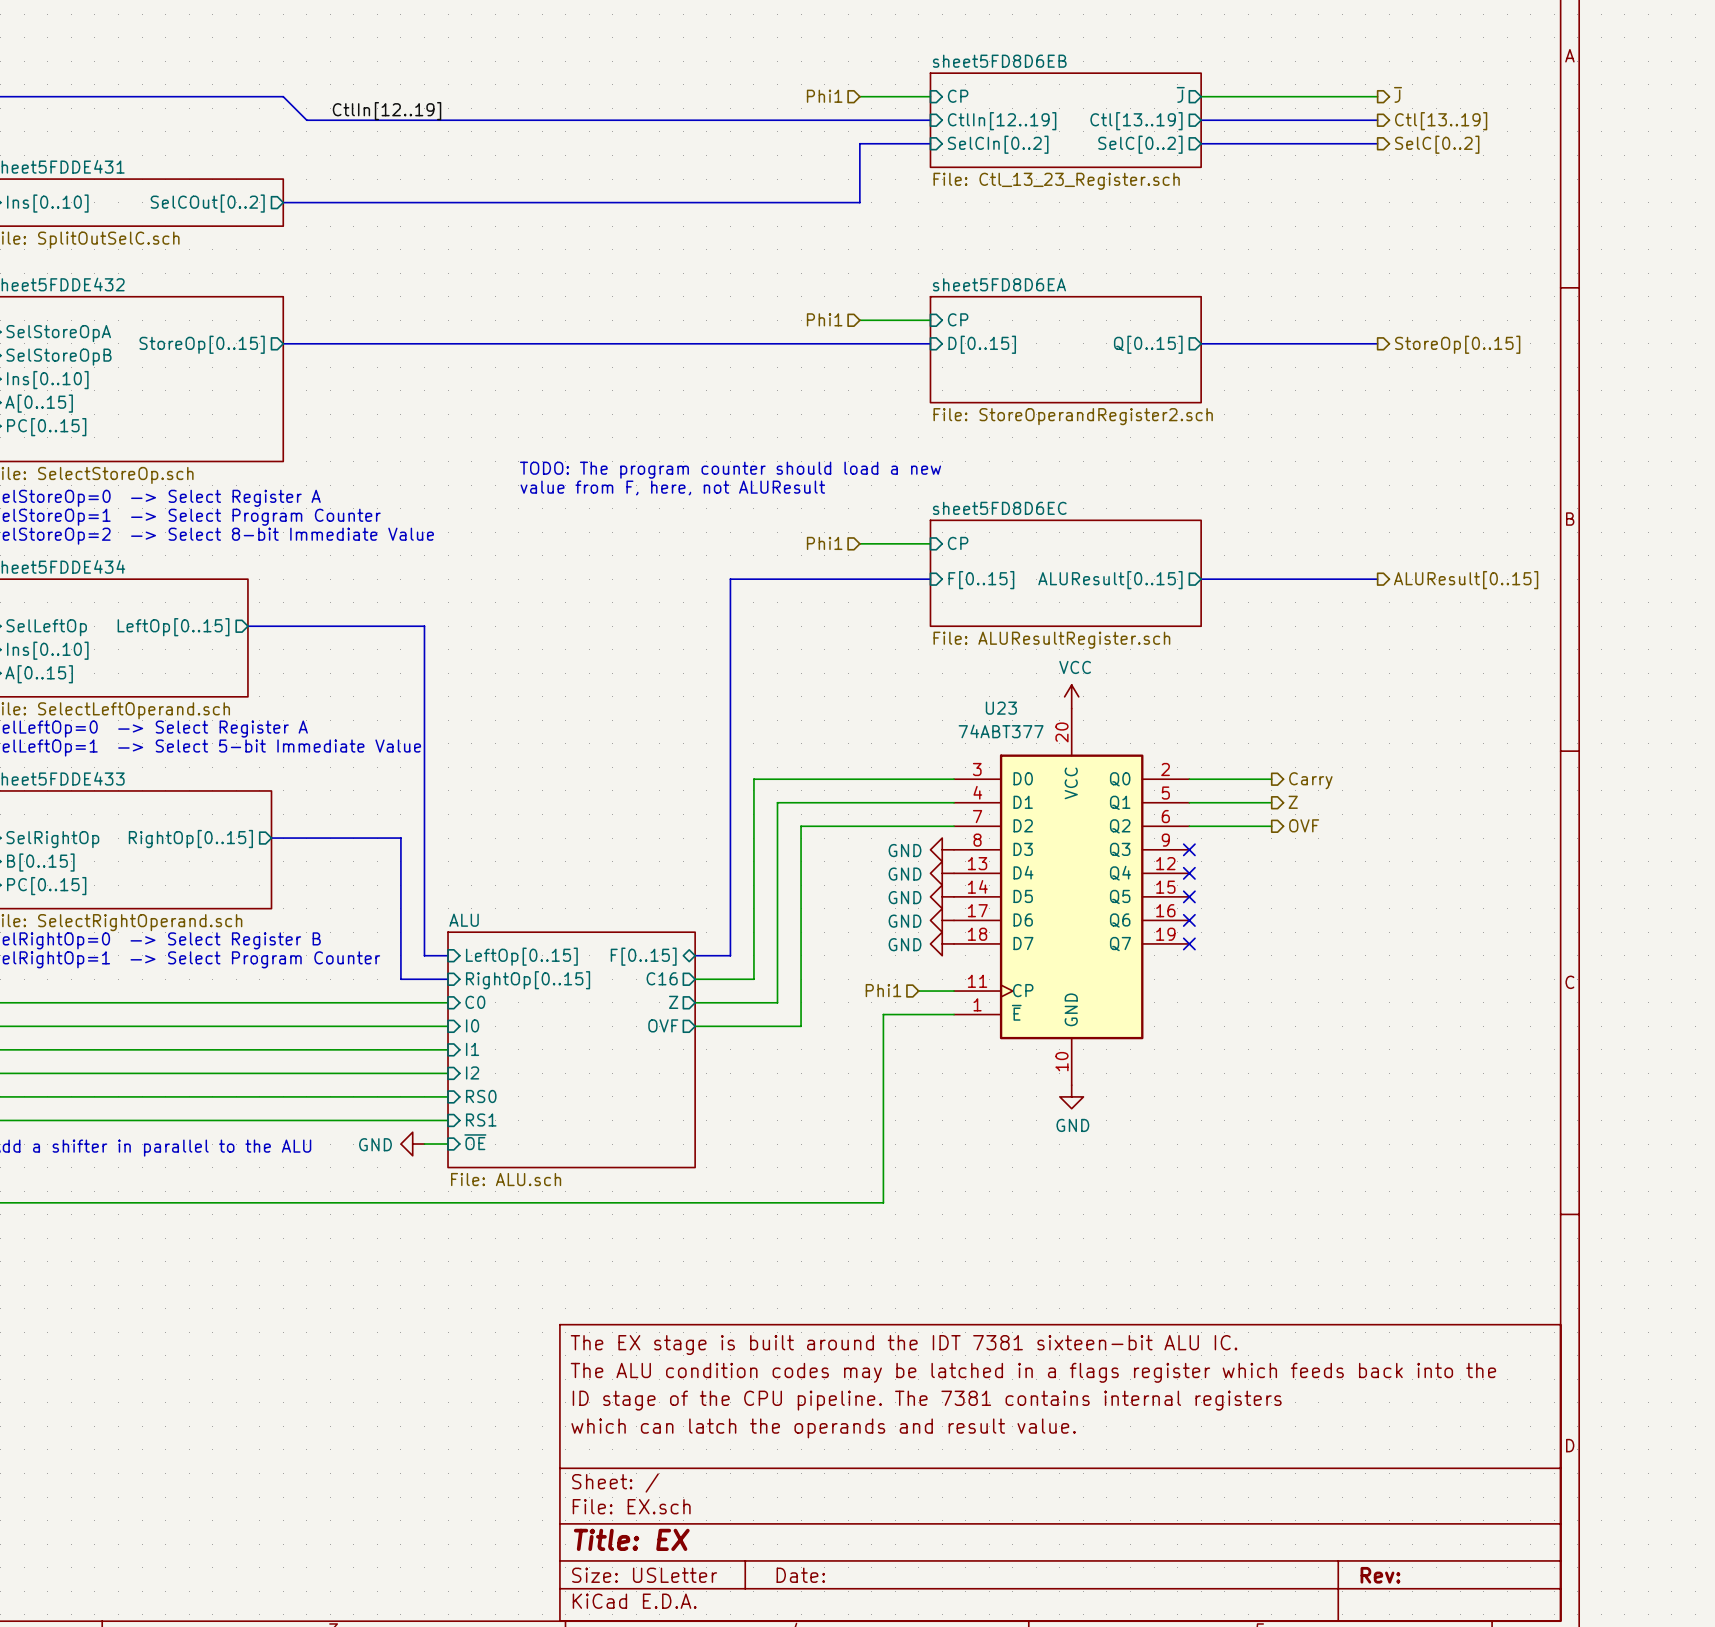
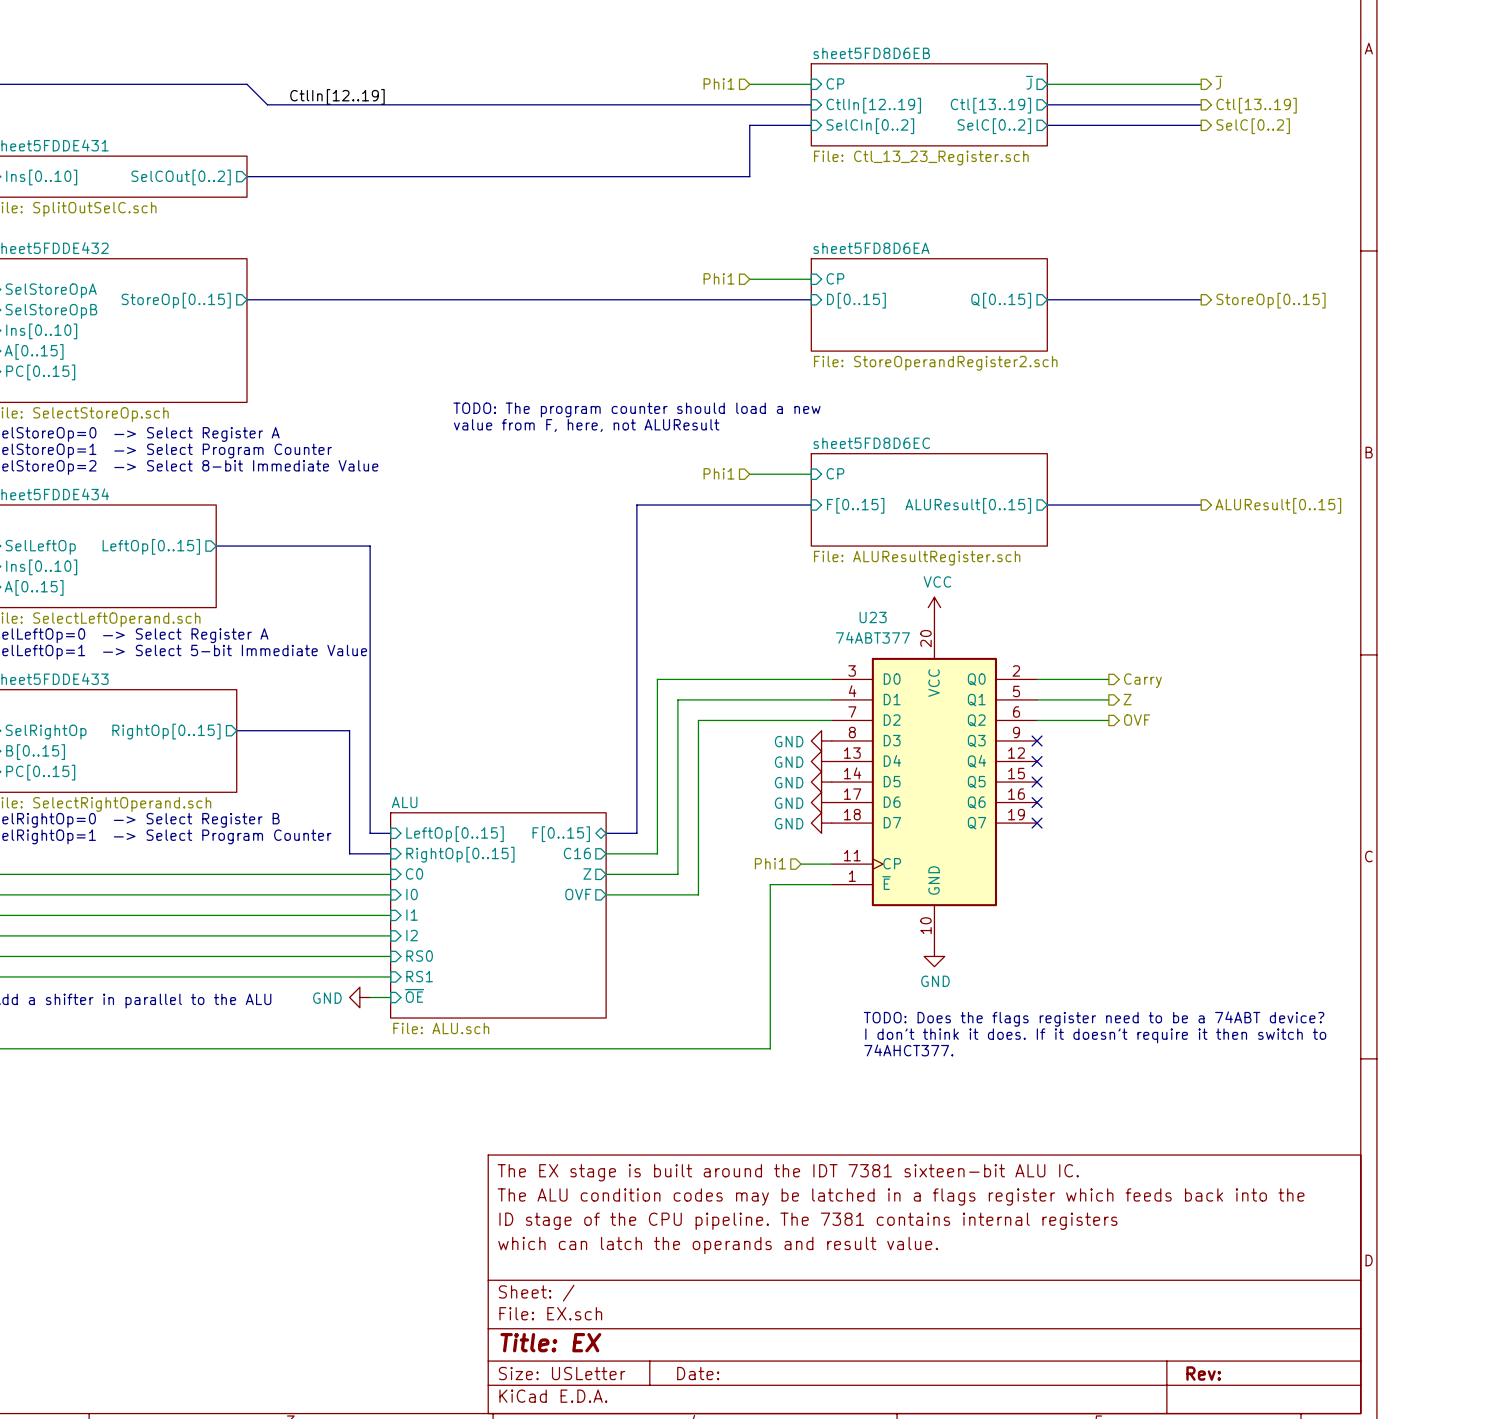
text: none -> TODO: Does the flags register need to be a 74ABT device? (1094, 1019)
text: none -> I don’t think it does. If it doesn’t require it then switch to (1095, 1035)
text: none -> 74AHCT377. (908, 1050)

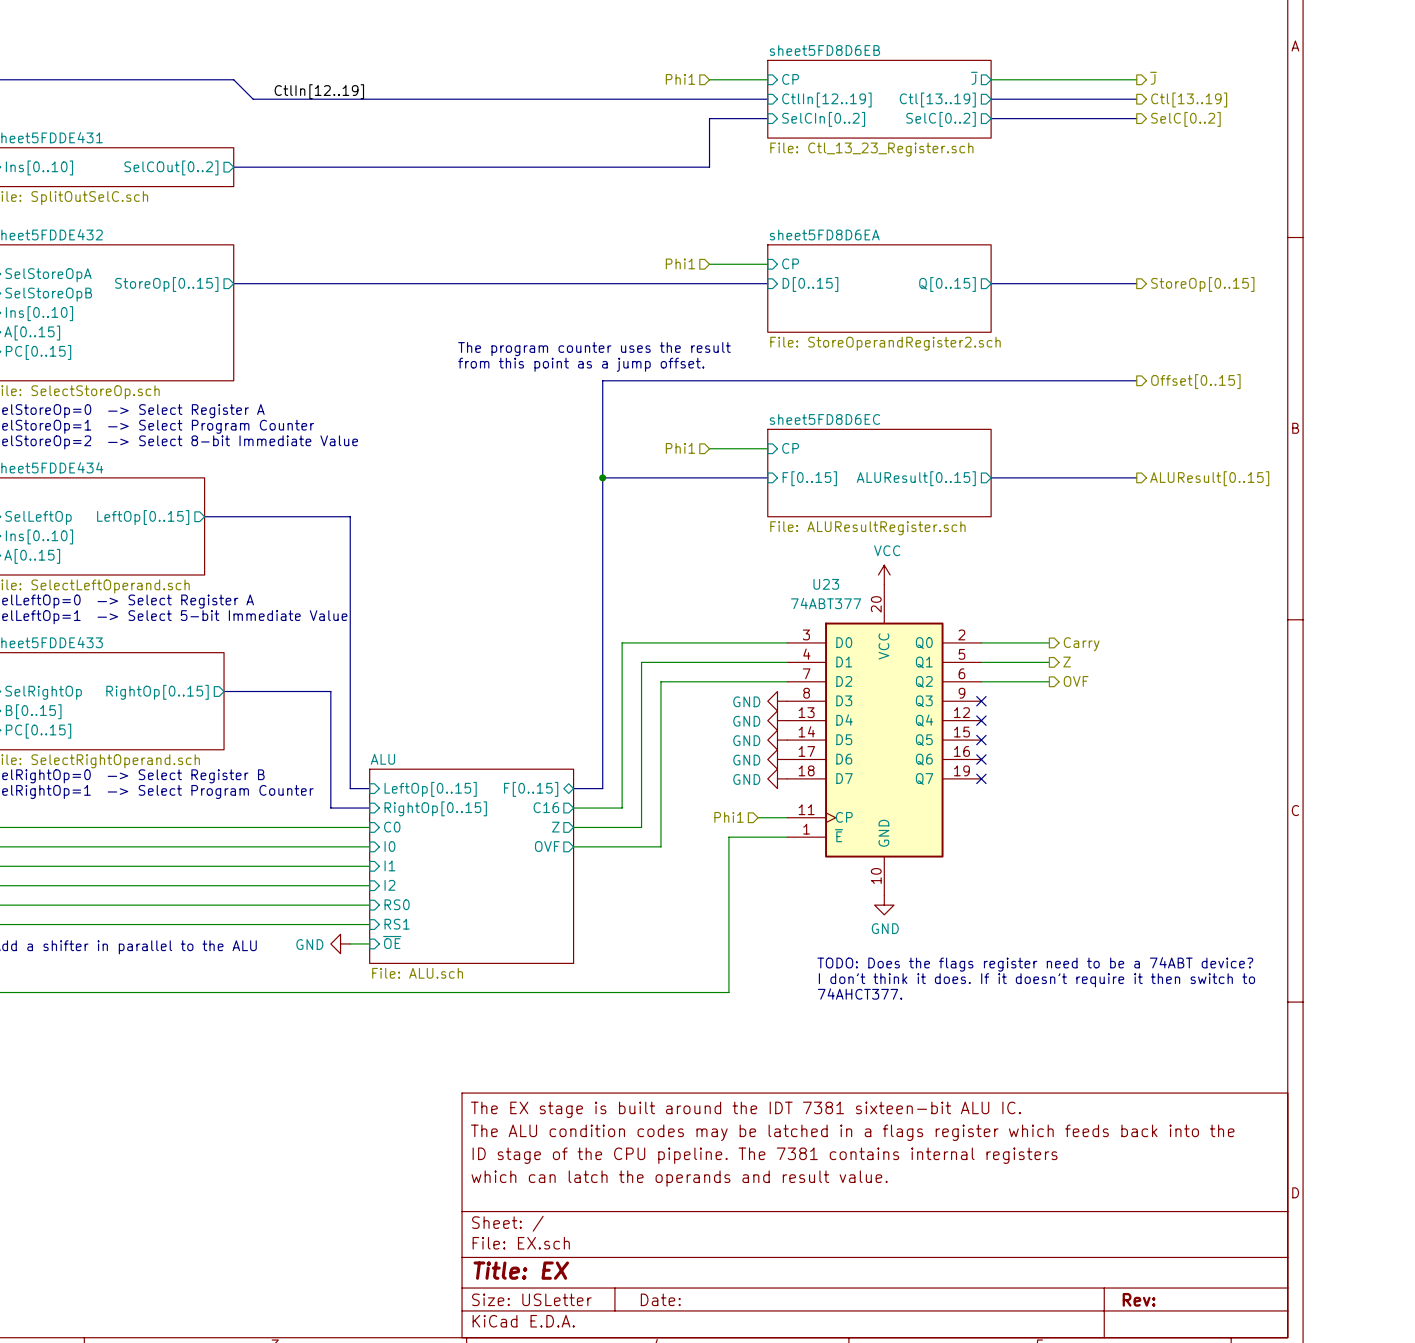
text: none -> The program counter uses the result (594, 349)
text: none -> from this point as a jump offset. (581, 364)
bus: none -> (1136, 380) (602, 380) (602, 477)
hierarchical label: none -> Offset[0..15] (1195, 381)
text: TODO: The program counter should load a new (636, 409) -> none
text: value from F, here, not ALUResult (586, 425) -> none
junction: none -> (602, 477)

